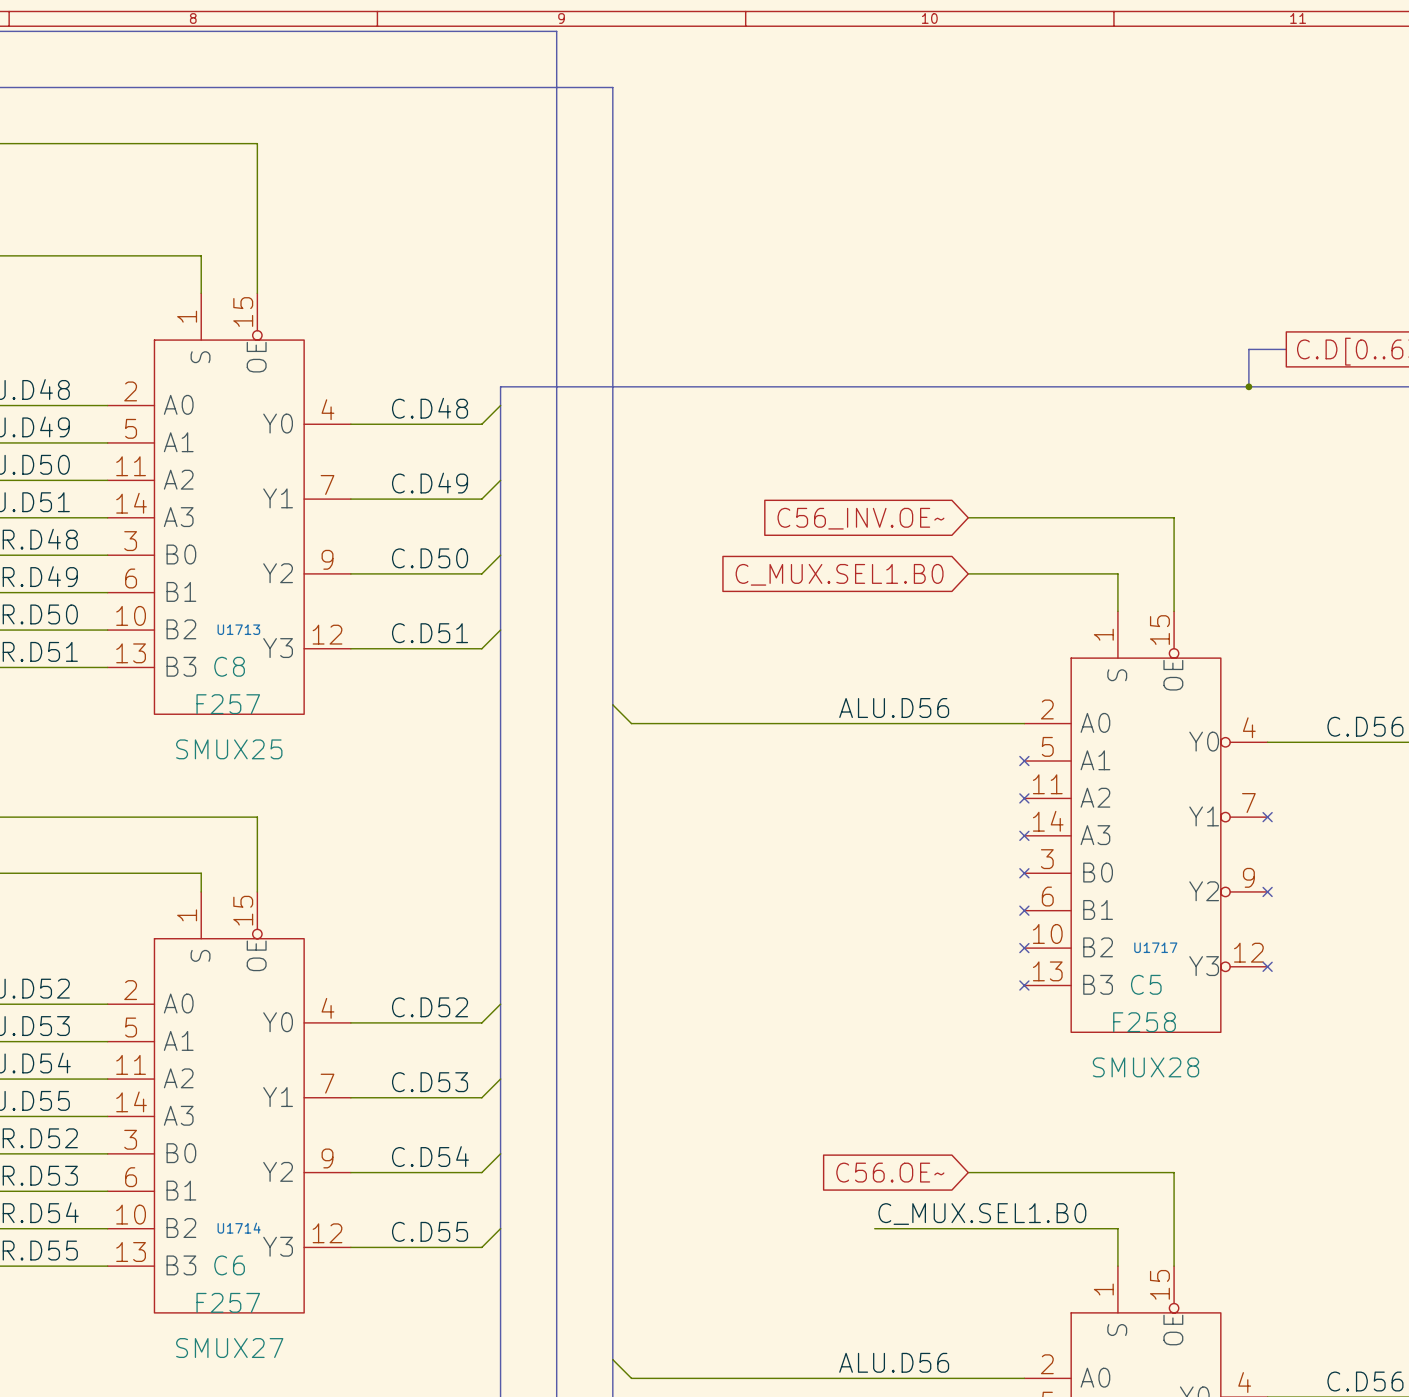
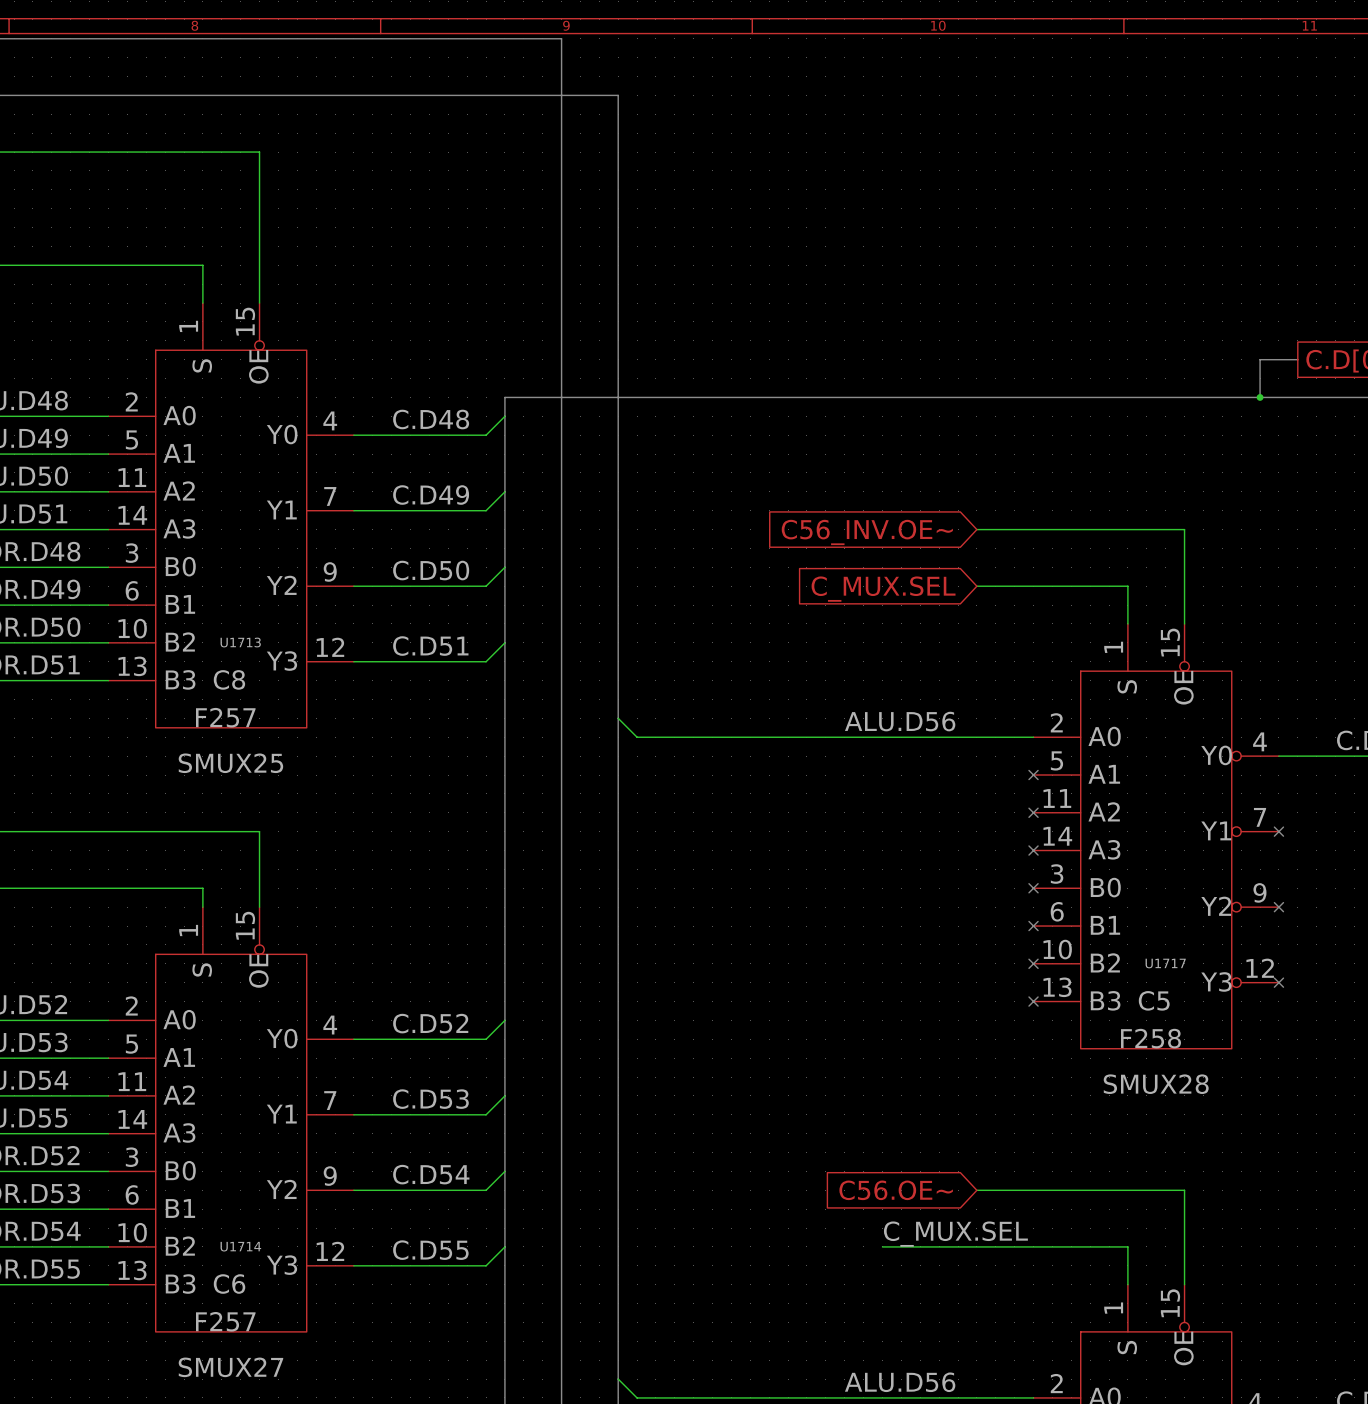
global label: C_MUX.SEL1.B0 (839, 574) -> C_MUX.SEL (883, 589)
label: C_MUX.SEL1.B0 (982, 1214) -> C_MUX.SEL (955, 1234)

